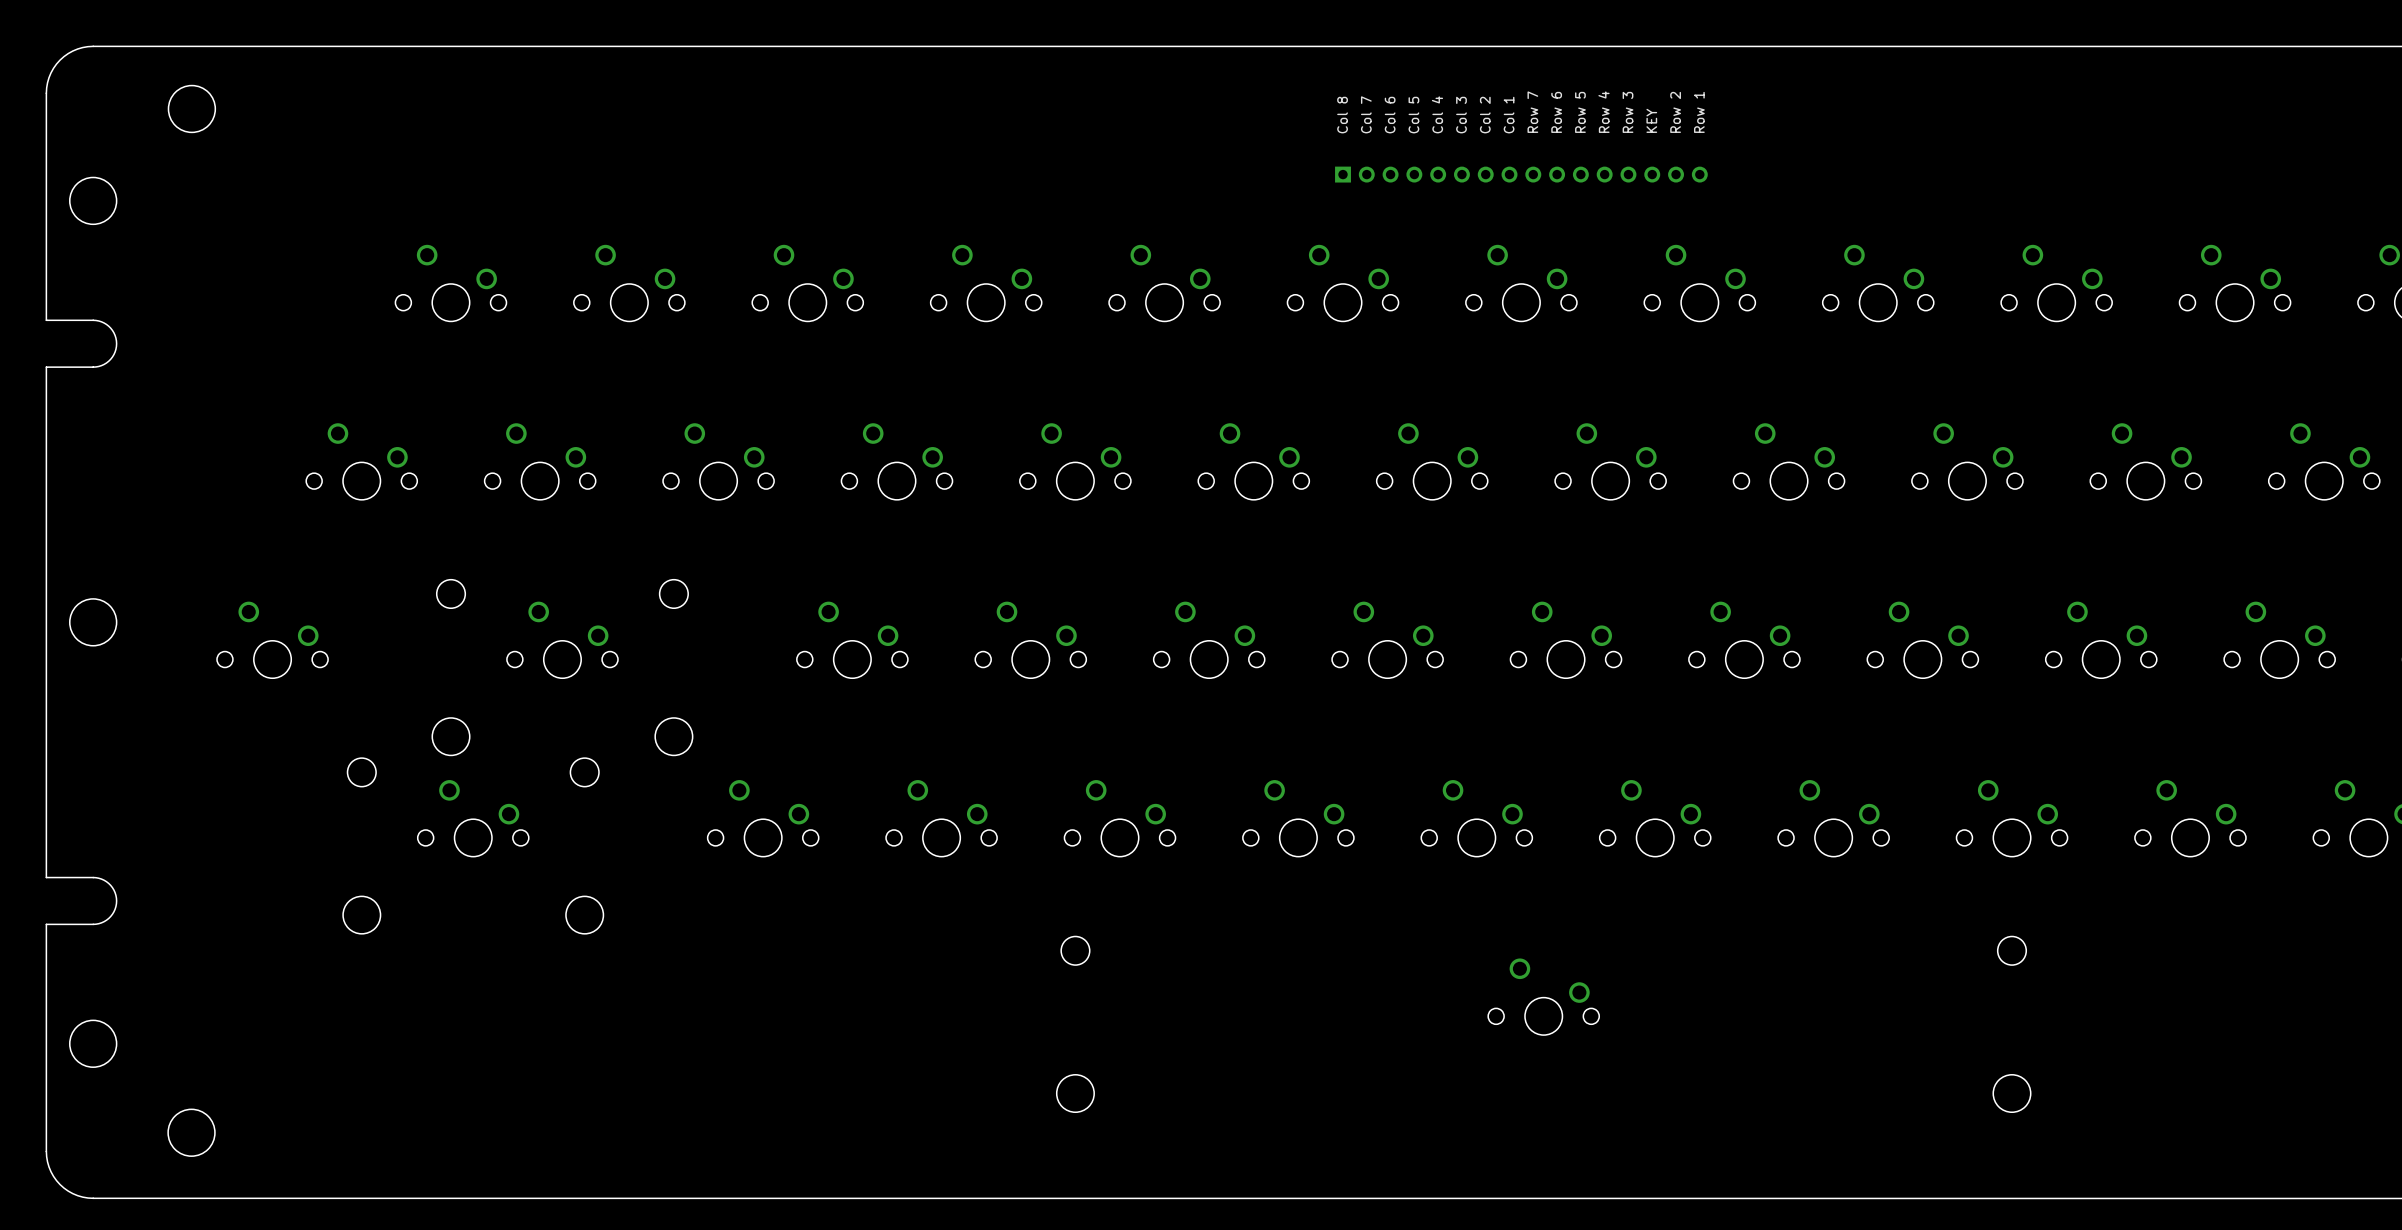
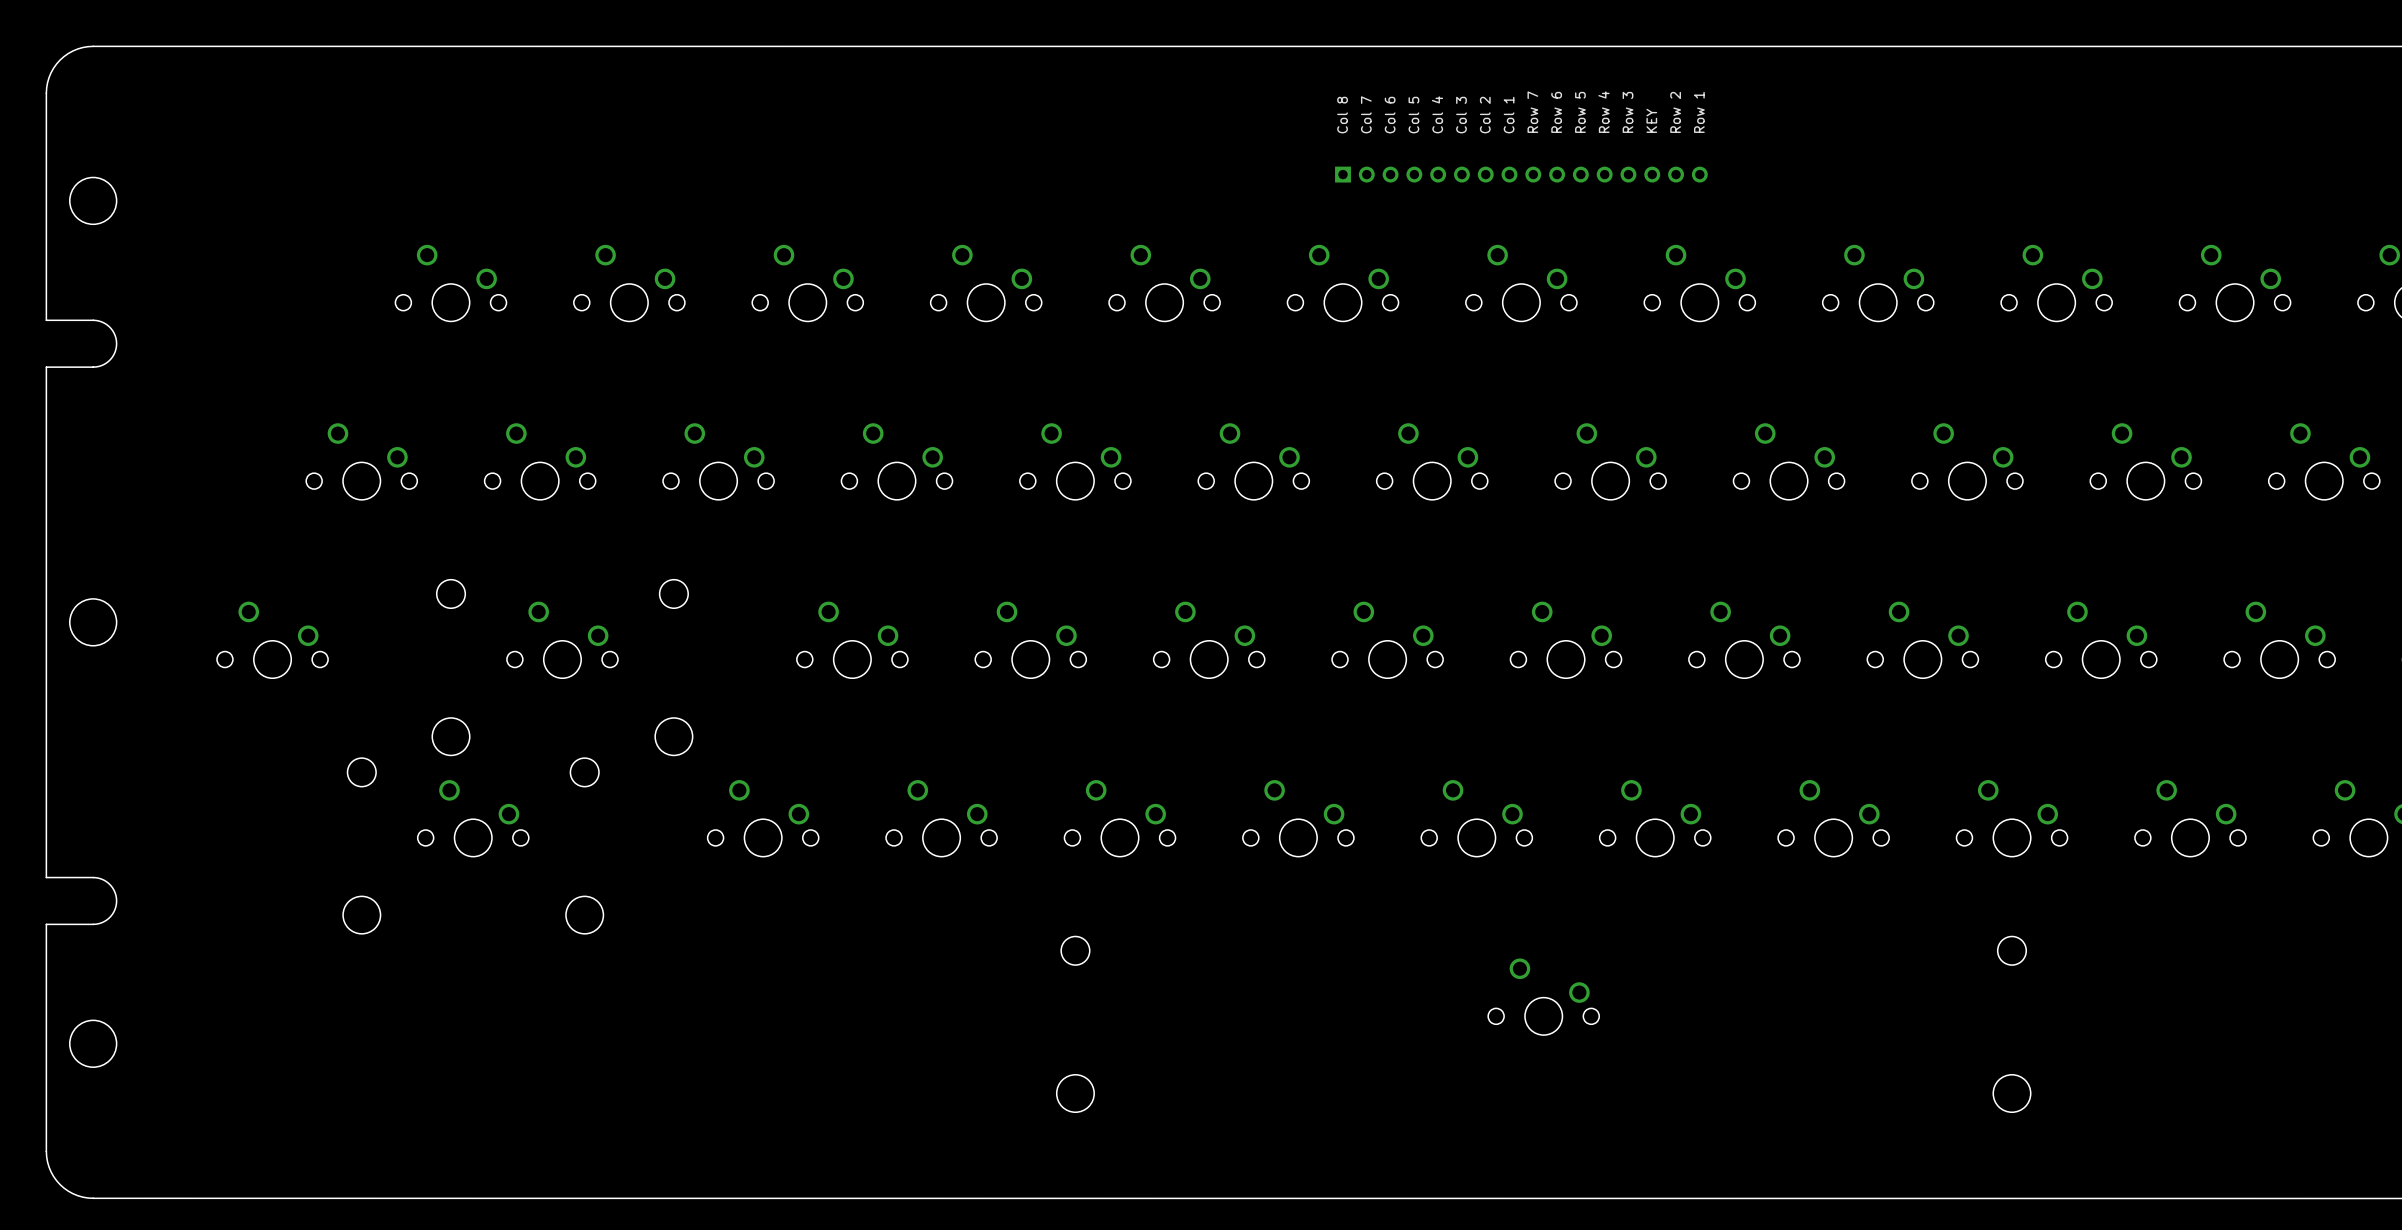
round board edge: [168, 85, 216, 133] -> none
round board edge: [167, 1109, 216, 1157] -> none

